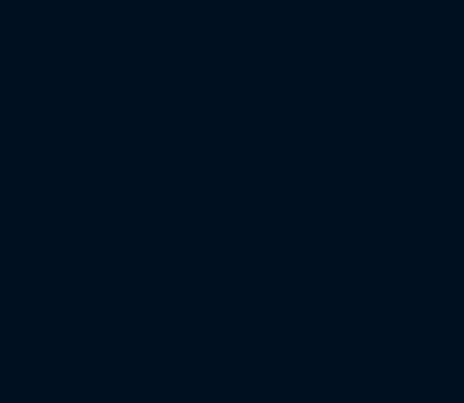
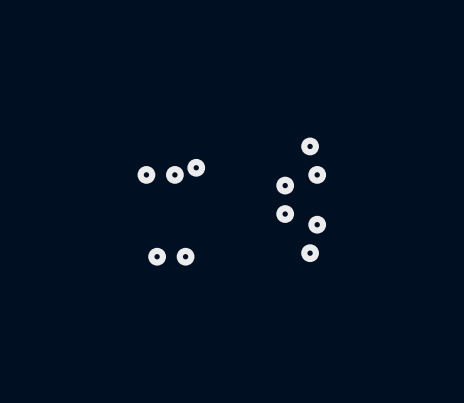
via: none -> (310, 146)
via: none -> (196, 167)
via: none -> (146, 174)
via: none -> (174, 174)
via: none -> (317, 174)
via: none -> (285, 185)
via: none -> (285, 214)
via: none -> (317, 224)
via: none -> (310, 253)
via: none -> (157, 256)
via: none -> (185, 256)

